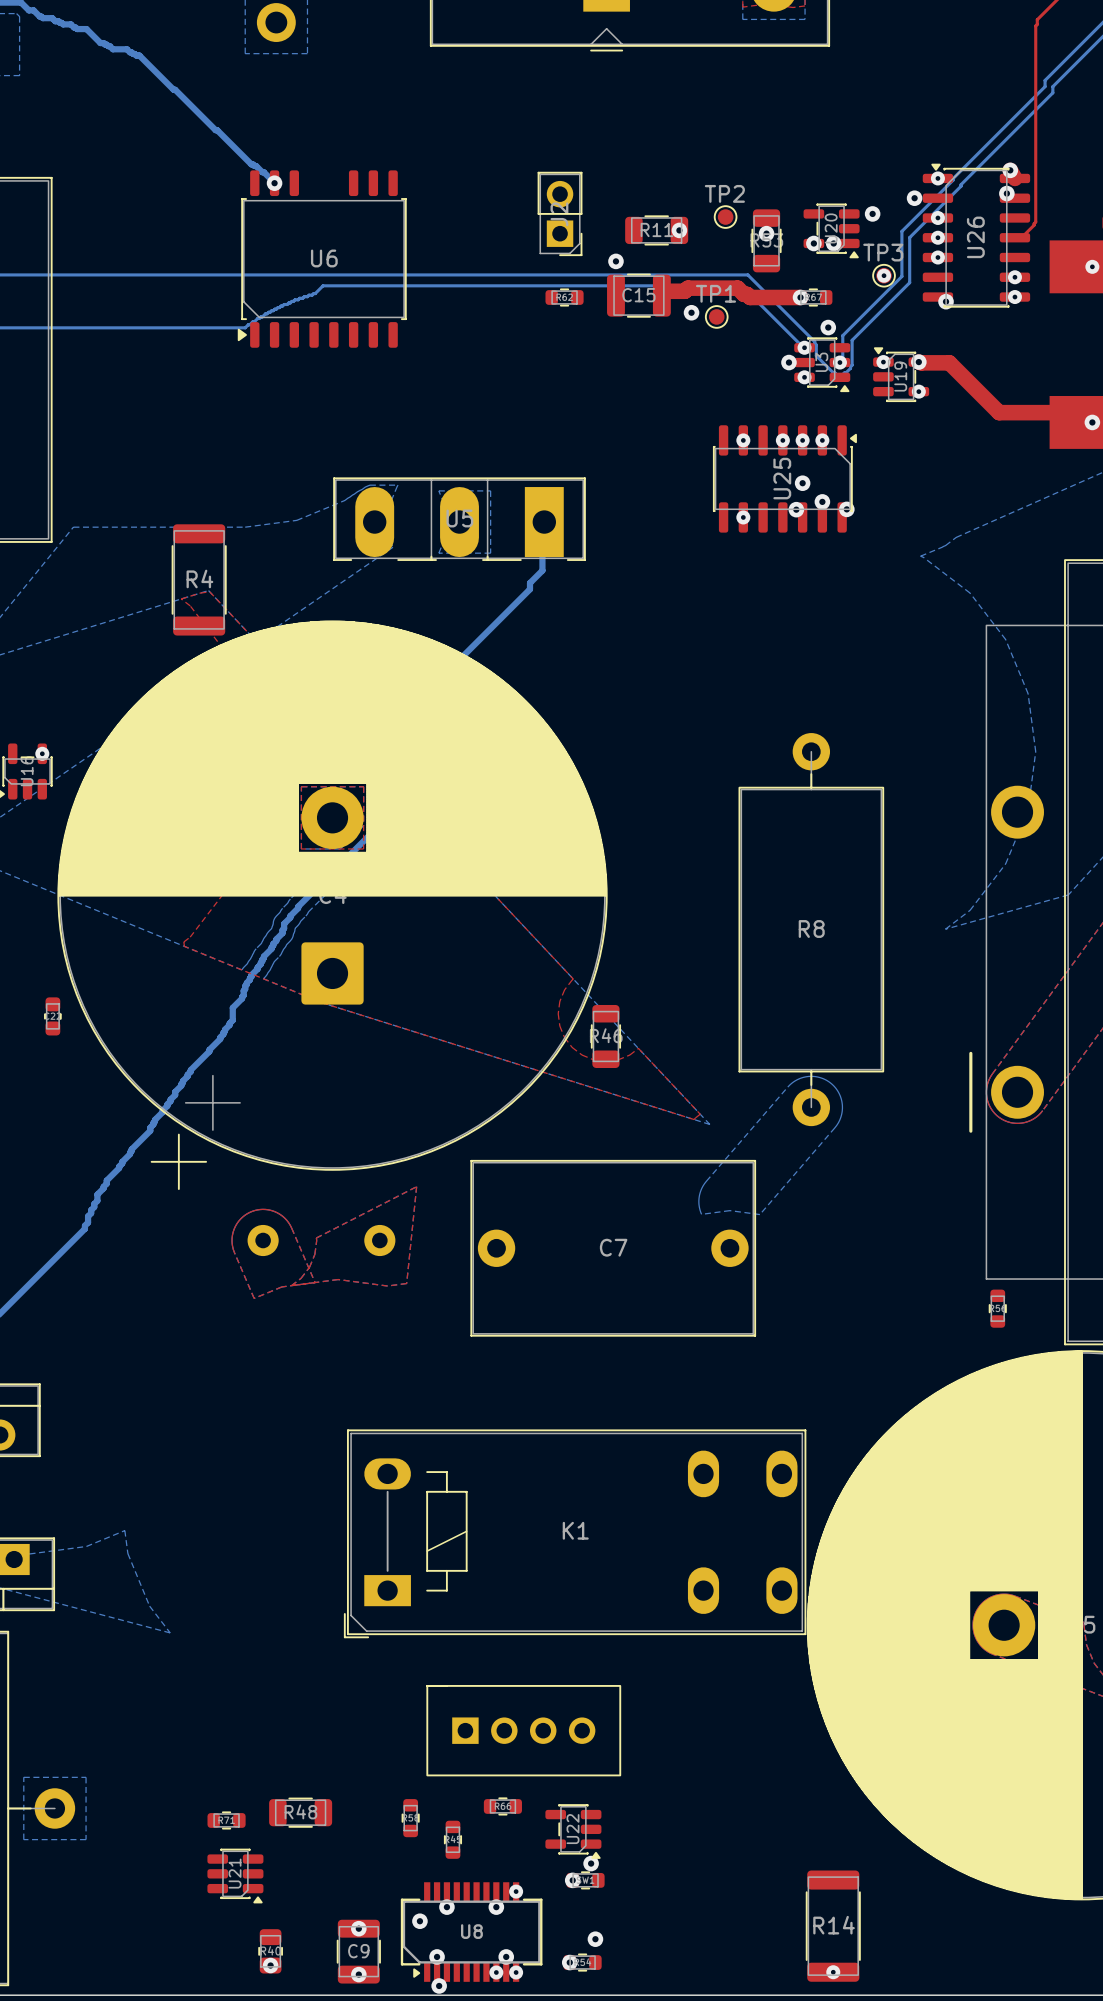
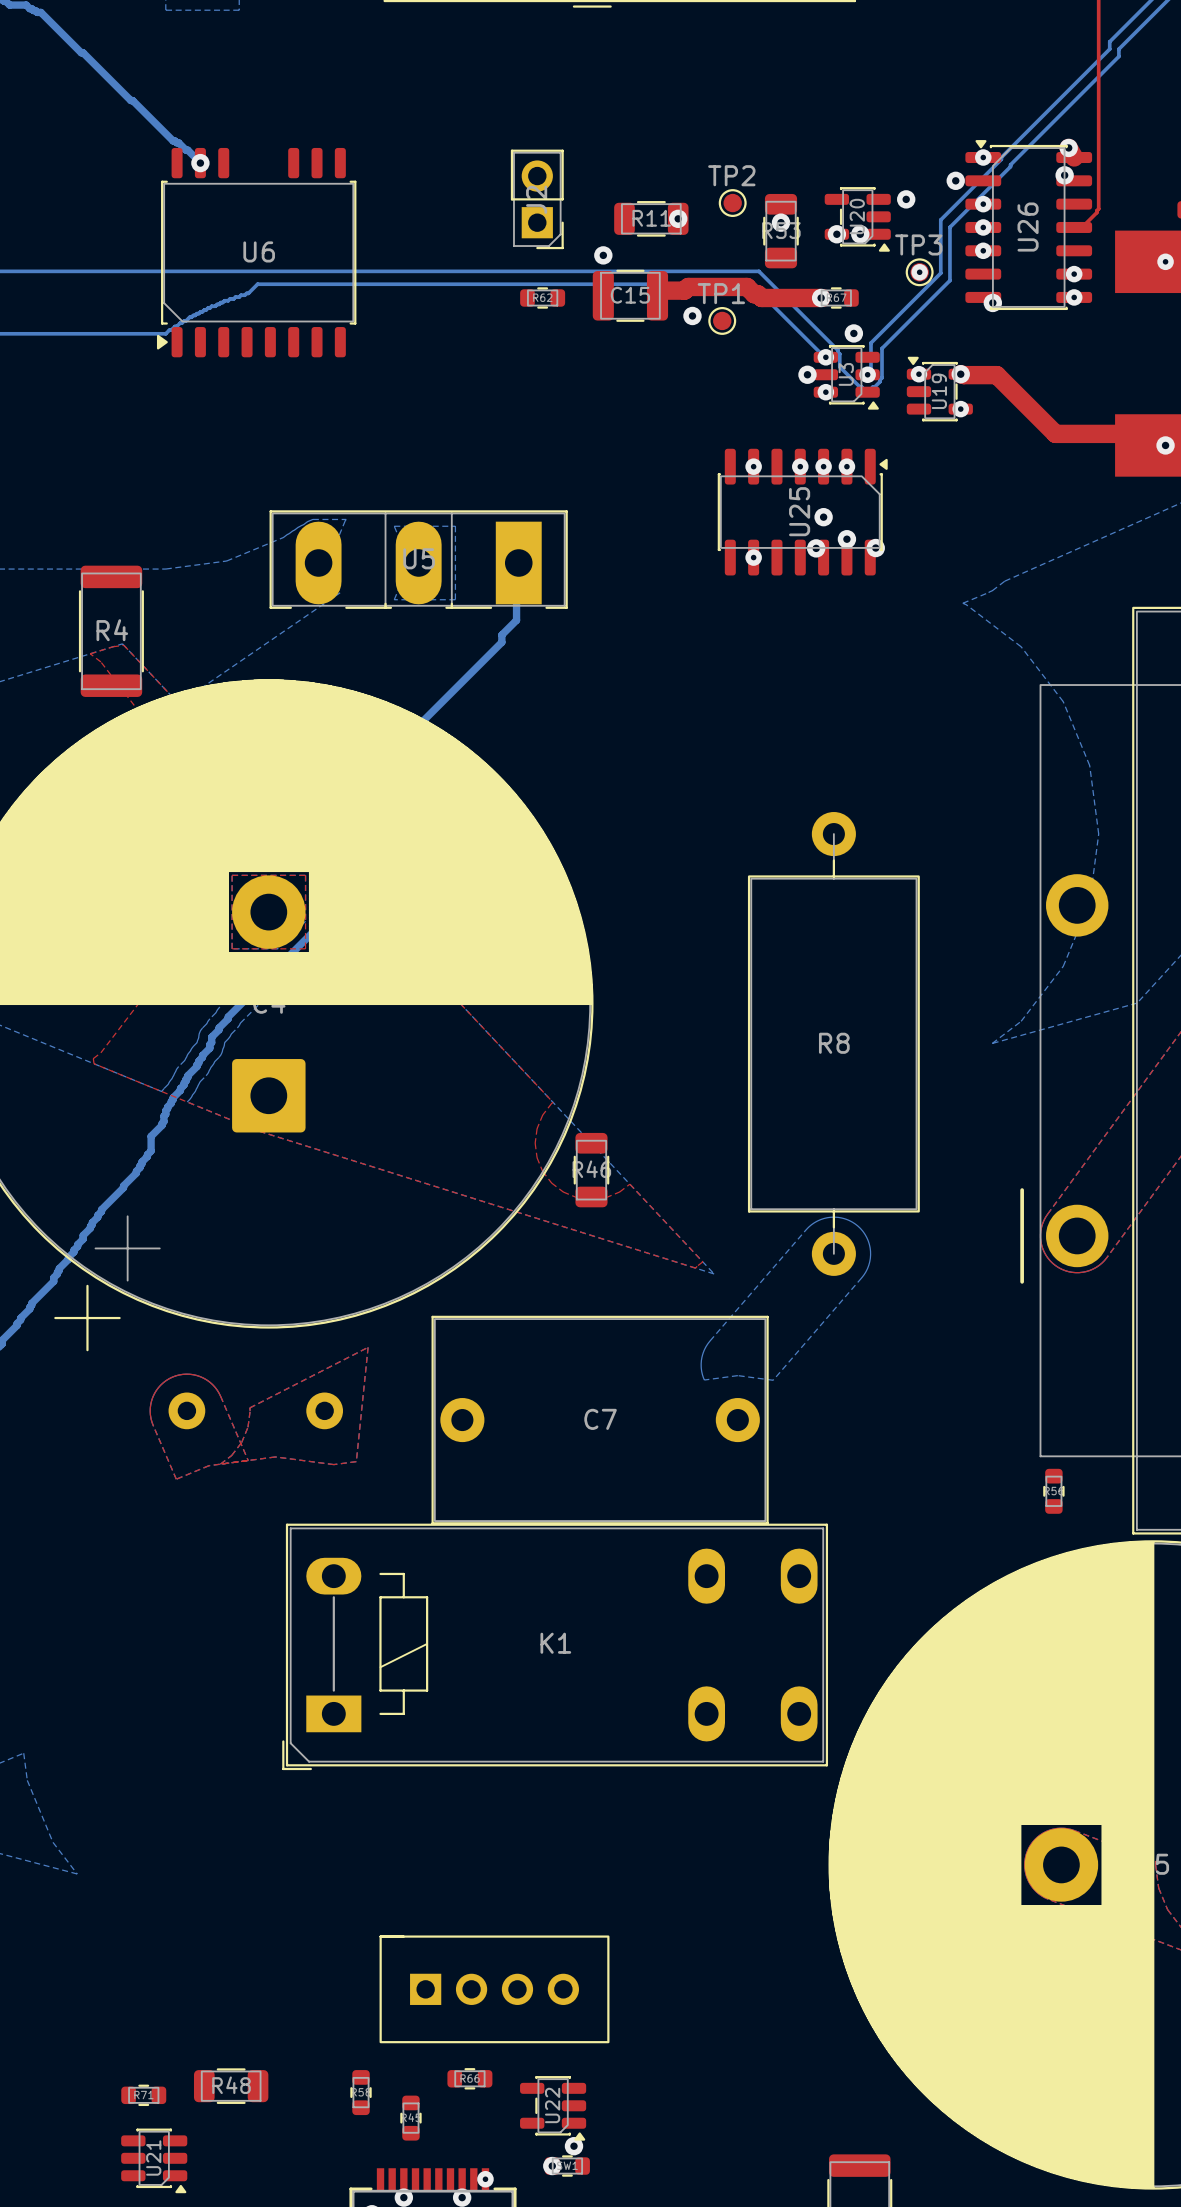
K1 position: (575, 1533) -> (555, 1646)

